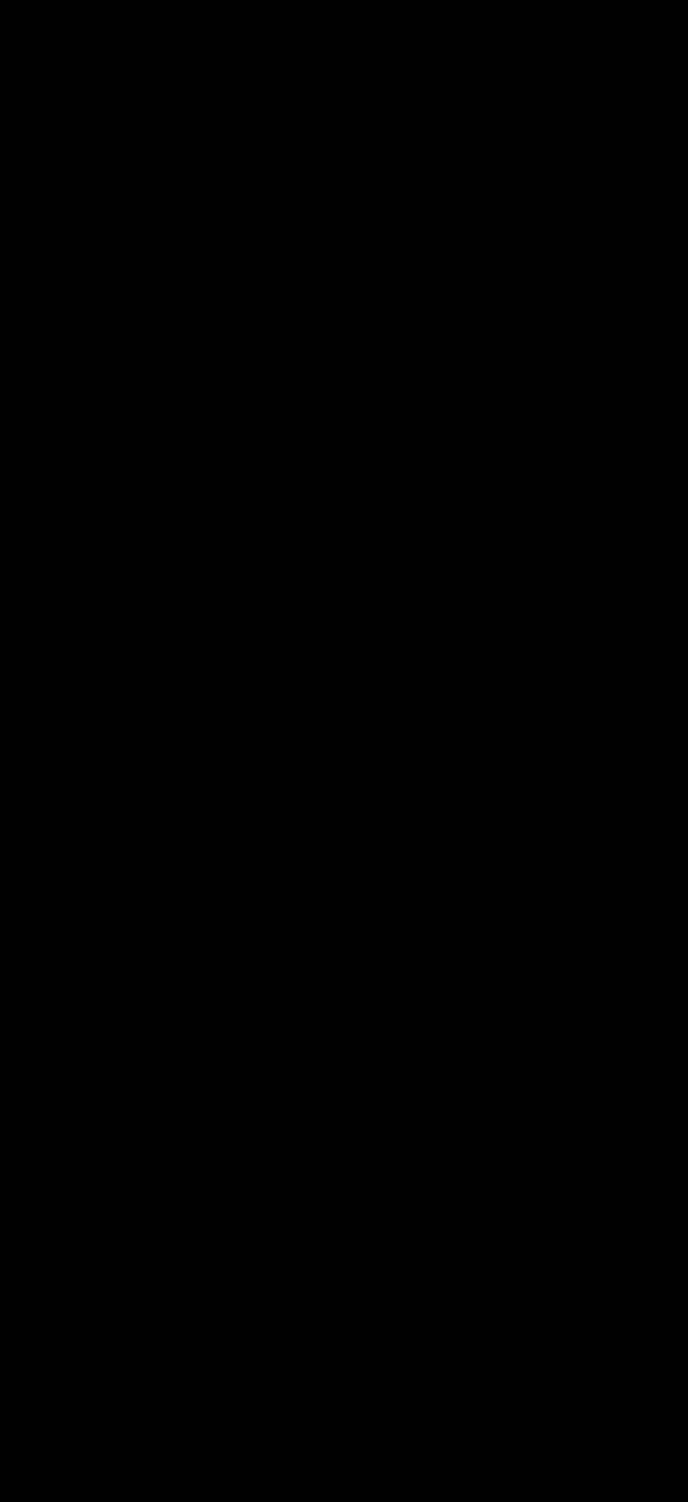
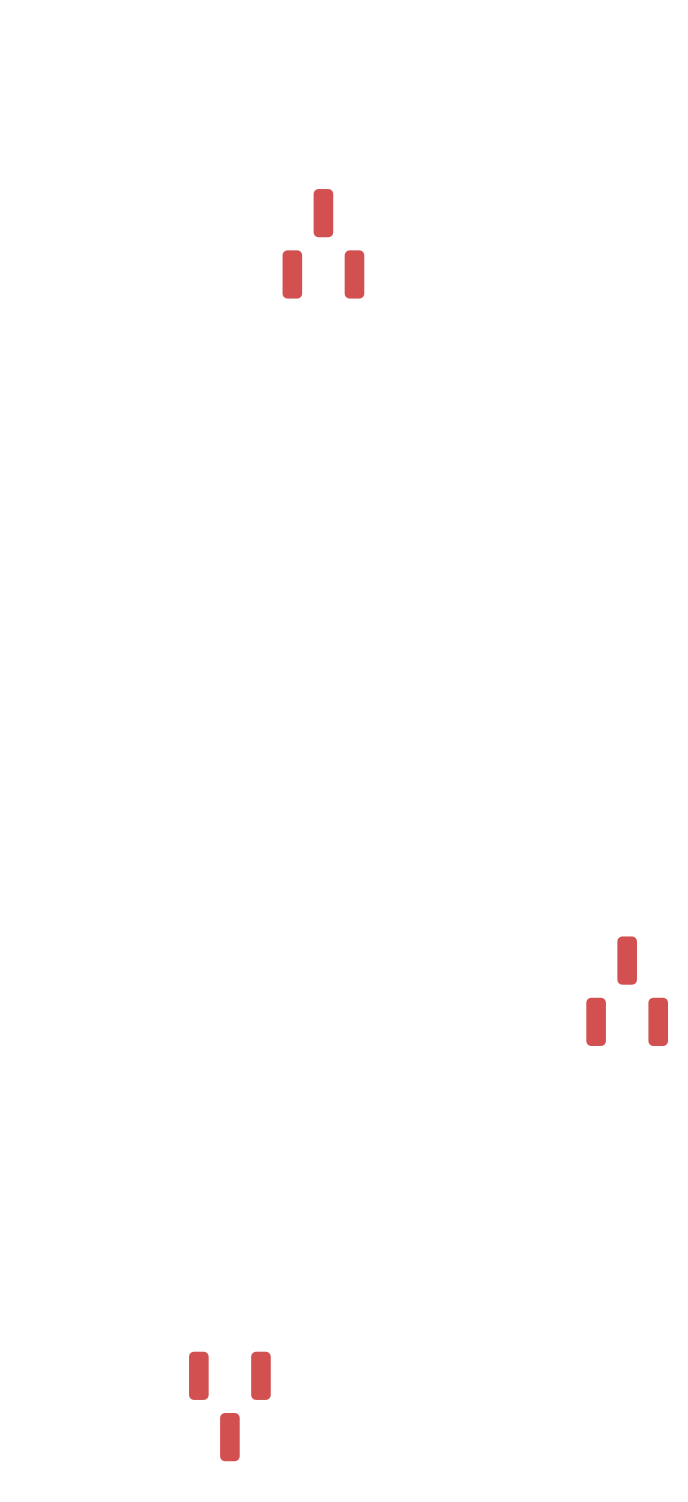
part: none -> (323, 243)
part: none -> (627, 991)
part: none -> (229, 1406)

